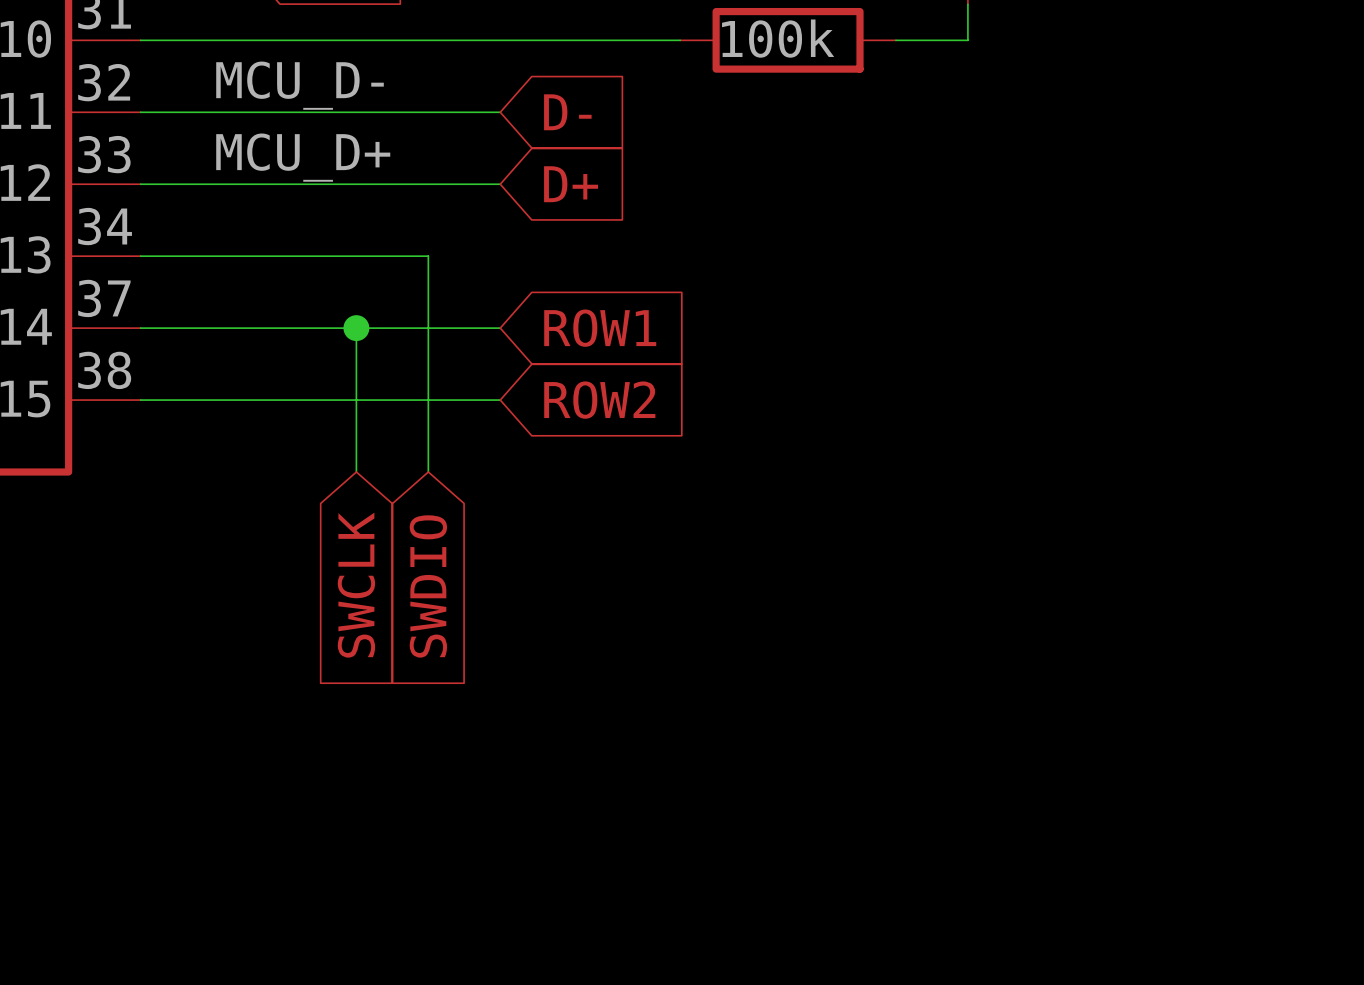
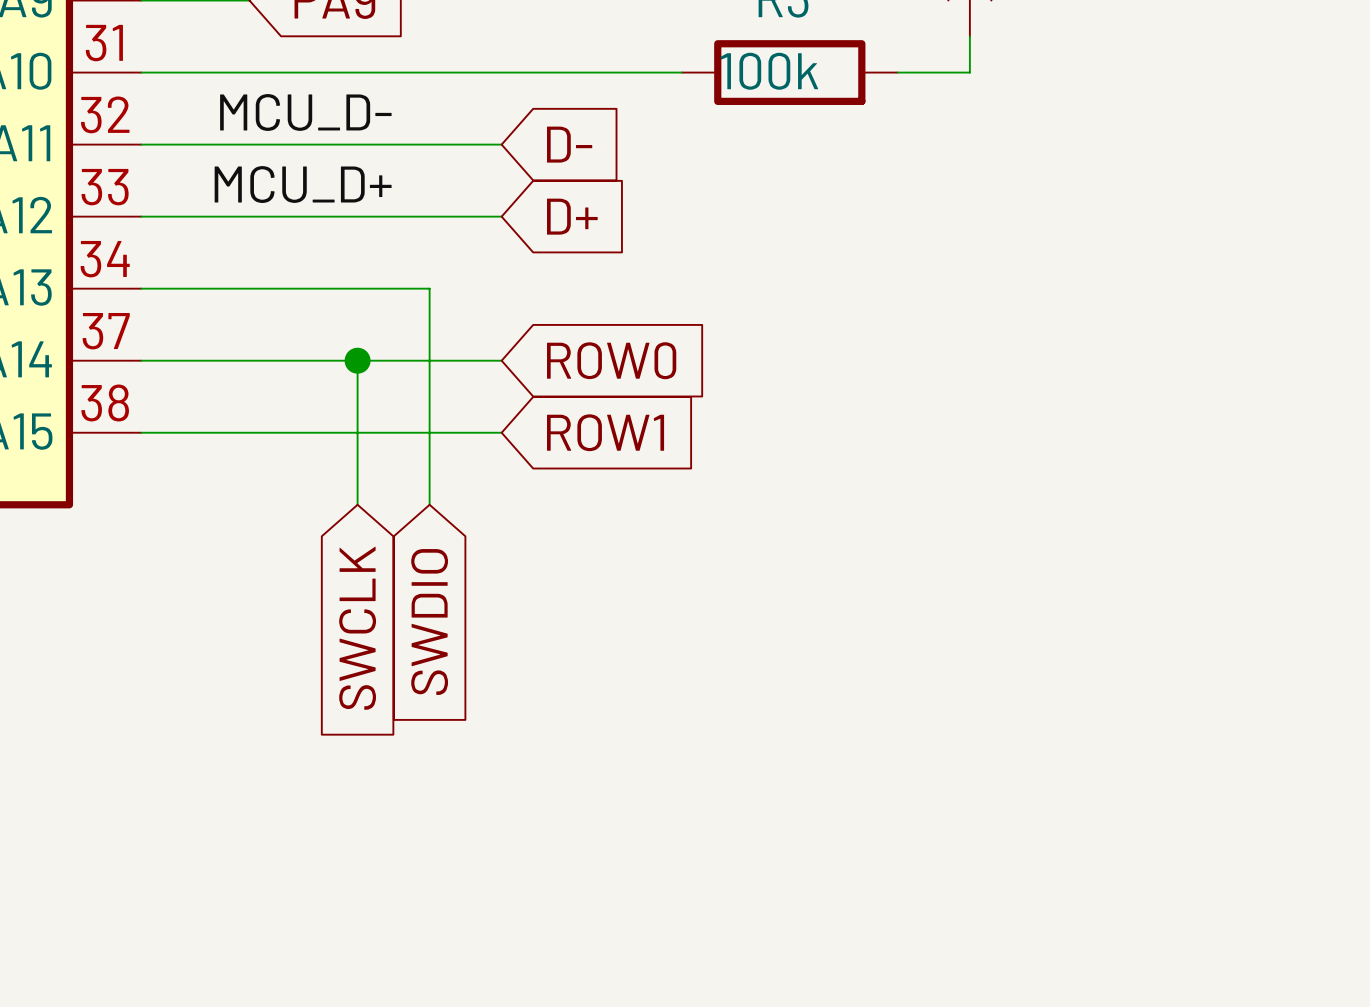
global label: ROW1 (600, 328) -> ROW0 (611, 360)
global label: ROW2 (599, 400) -> ROW1 (605, 432)

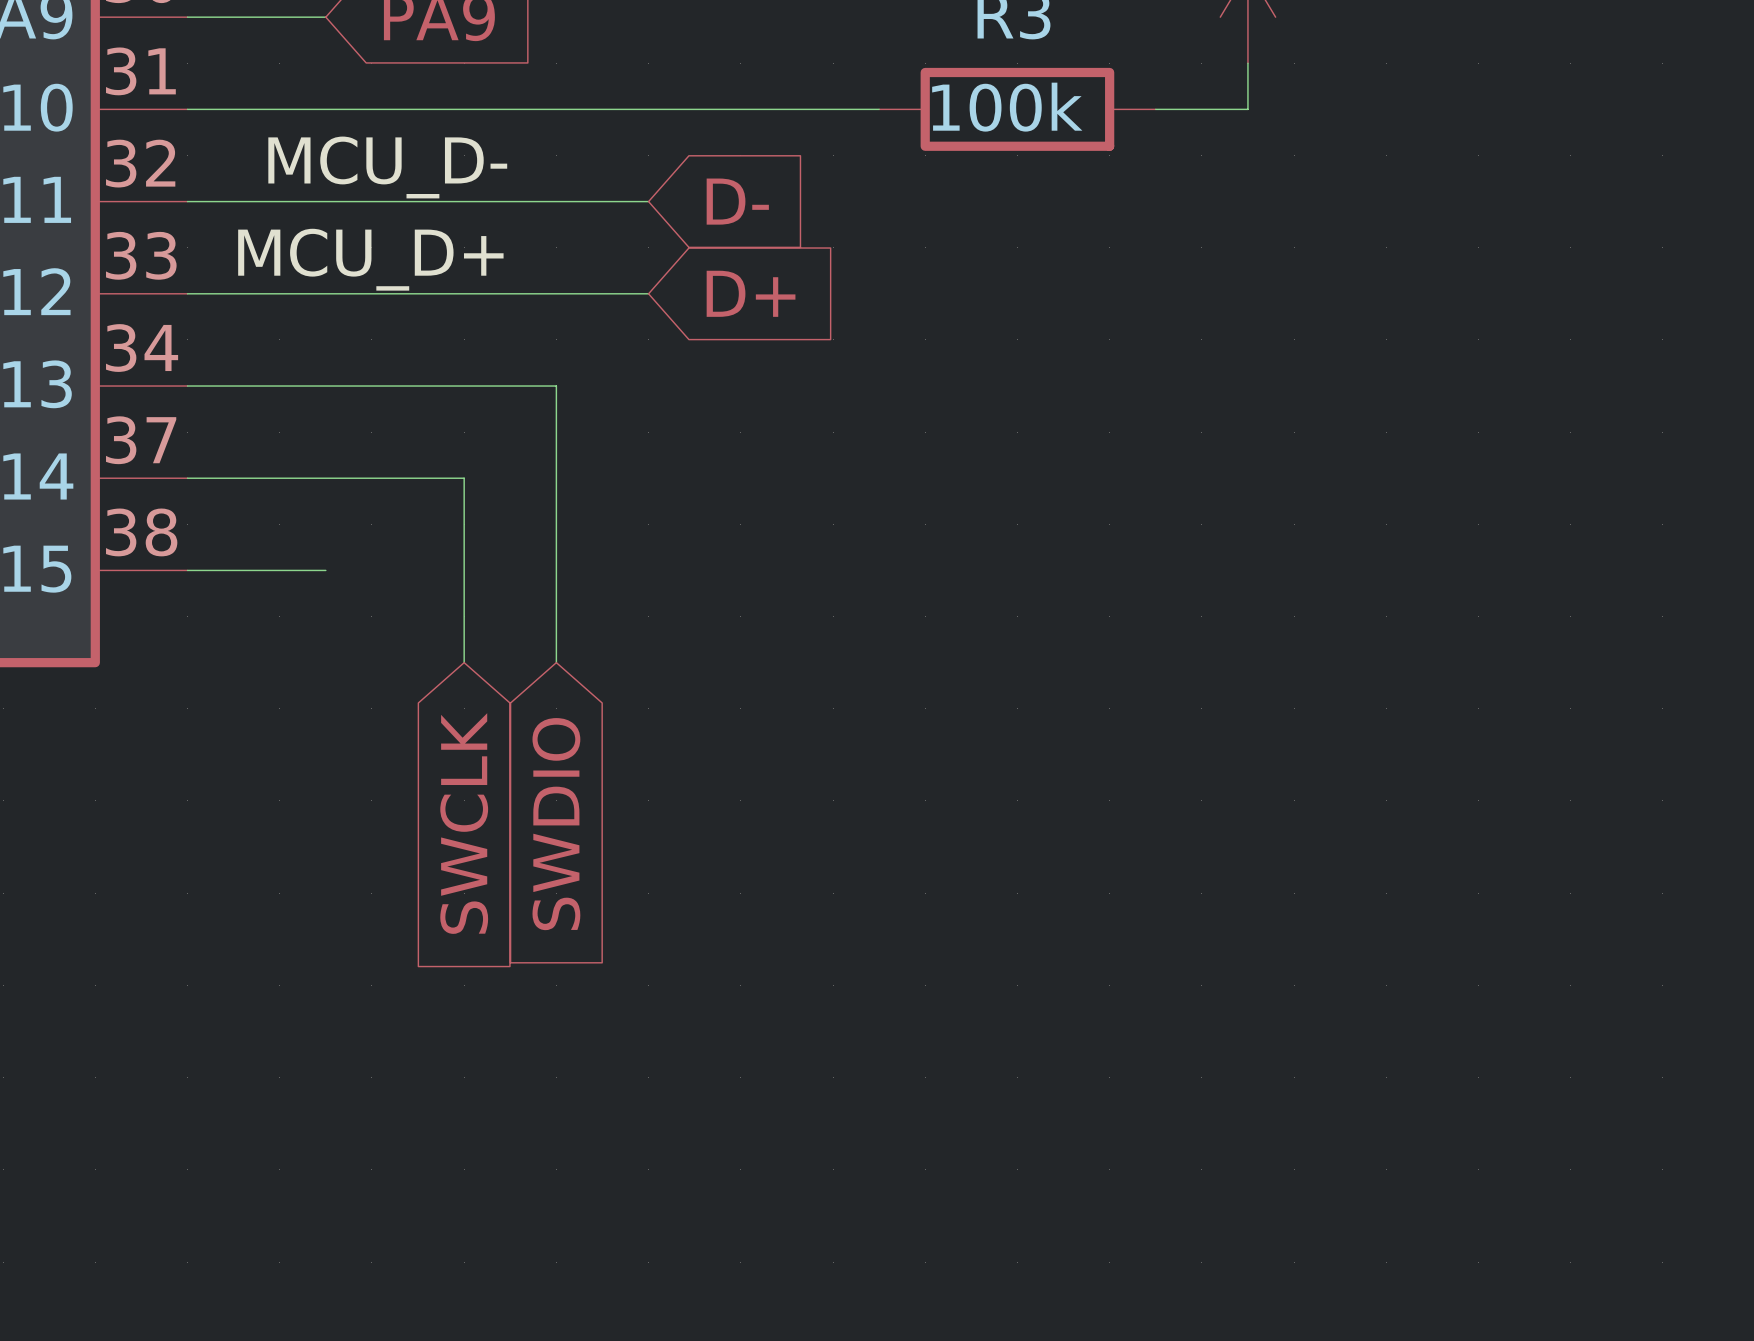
wire: (357, 360) (501, 360) -> none
junction: (357, 360) -> none
global label: ROW0 (611, 360) -> none
wire: (249, 432) (501, 432) -> none
global label: ROW1 (605, 432) -> none

